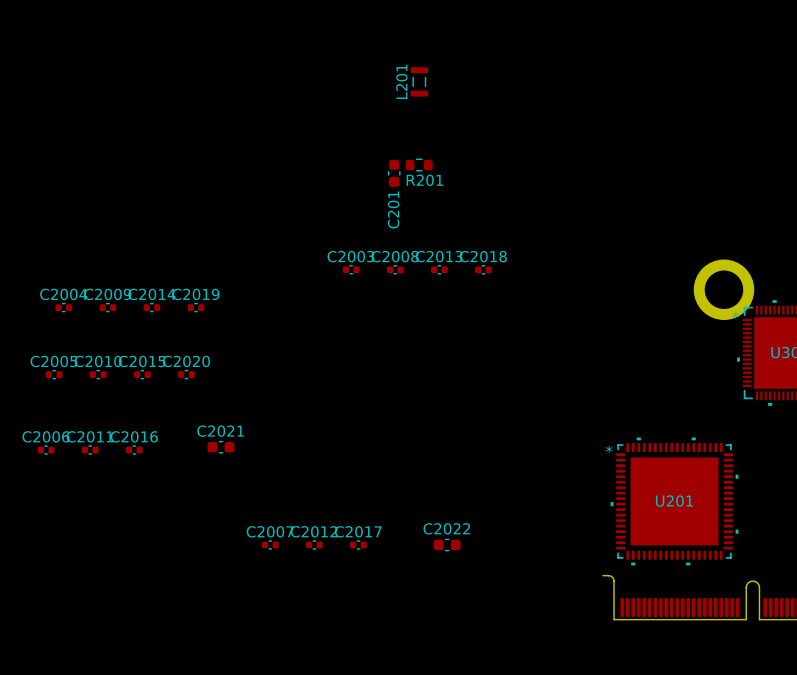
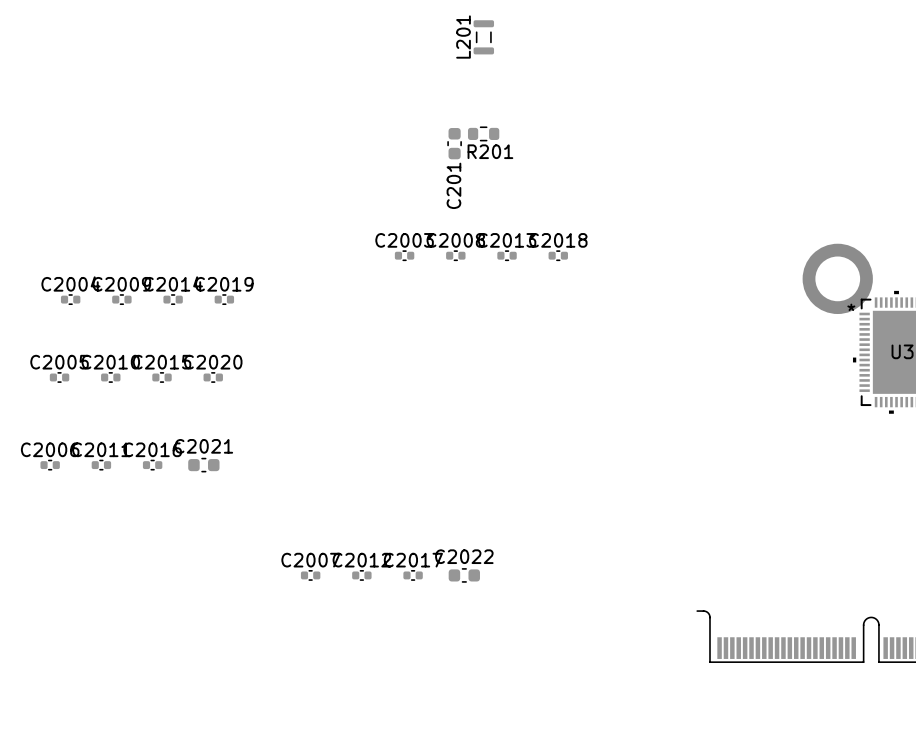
C2021 position: (220, 447) -> (203, 465)
U201: (674, 501) -> none
C2022 position: (447, 545) -> (464, 575)

